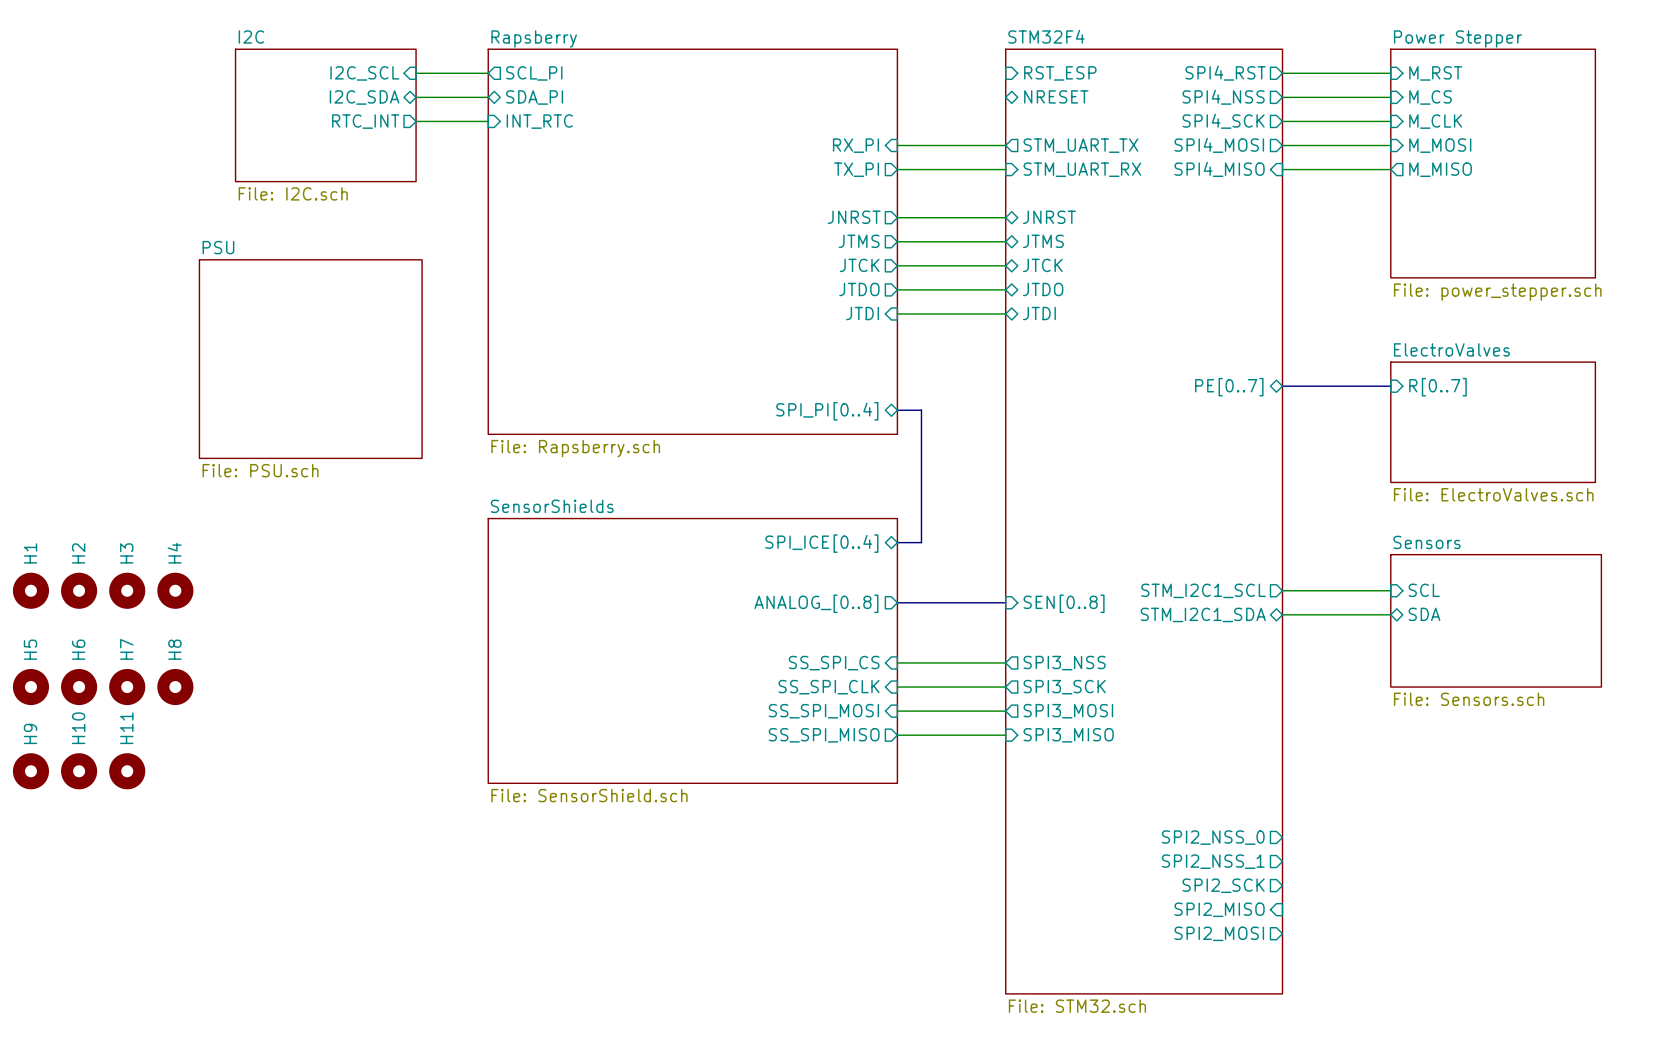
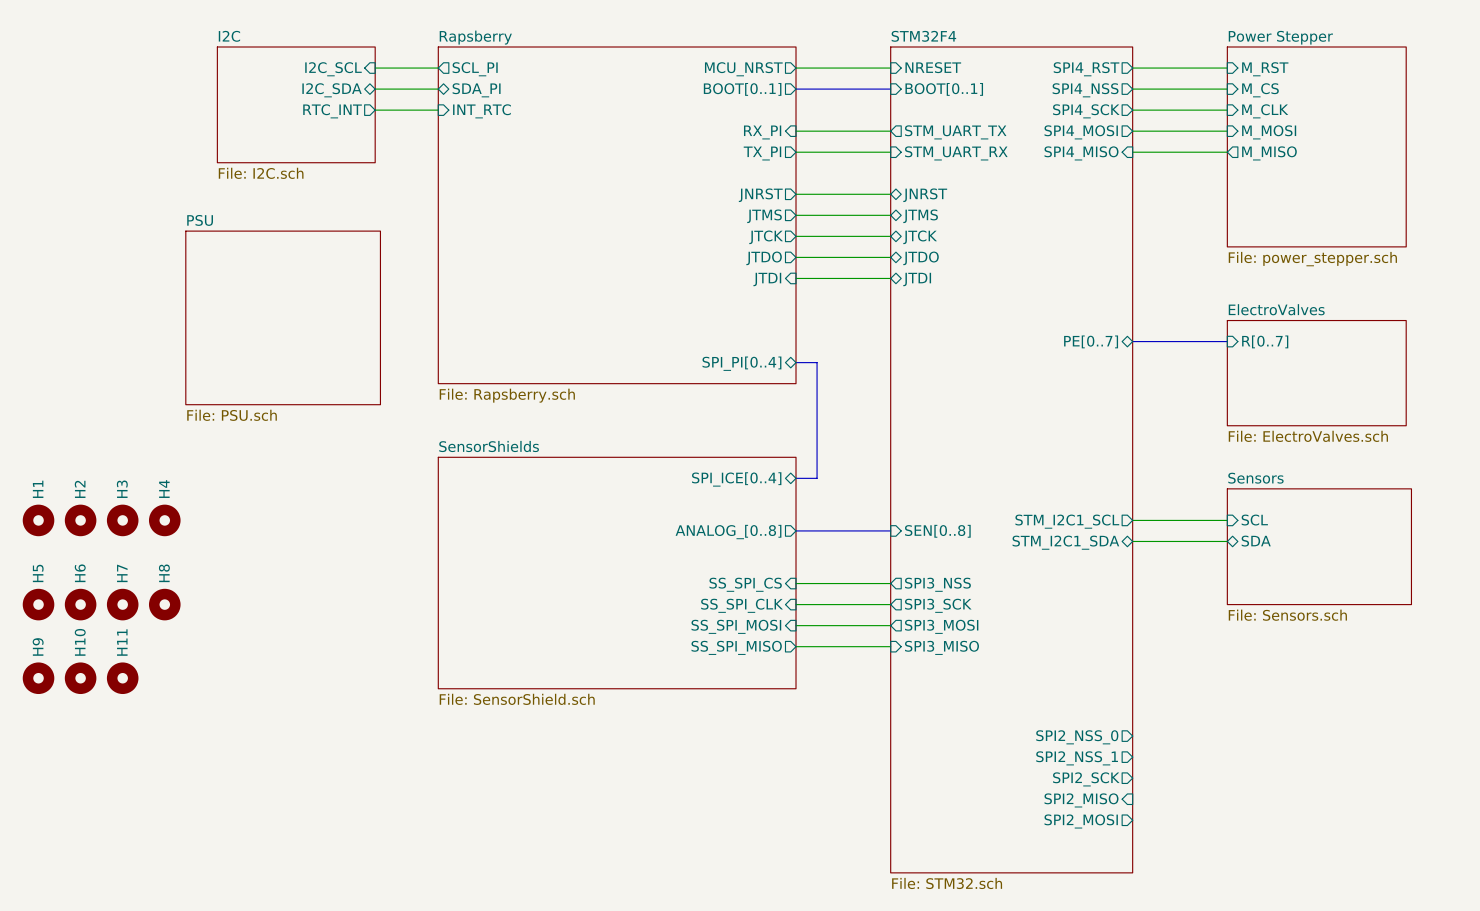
sheet pin: none -> MCU_NRST (743, 69)
wire: none -> (796, 68) (890, 68)
sheet pin: RST_ESP (1060, 73) -> NRESET (933, 67)
sheet pin shape: bidirectional (1056, 96) -> input (944, 89)
sheet pin: NRESET (1056, 96) -> BOOT[0..1] (944, 89)
bus: none -> (796, 89) (890, 89)
sheet pin: none -> BOOT[0..1] (742, 89)

